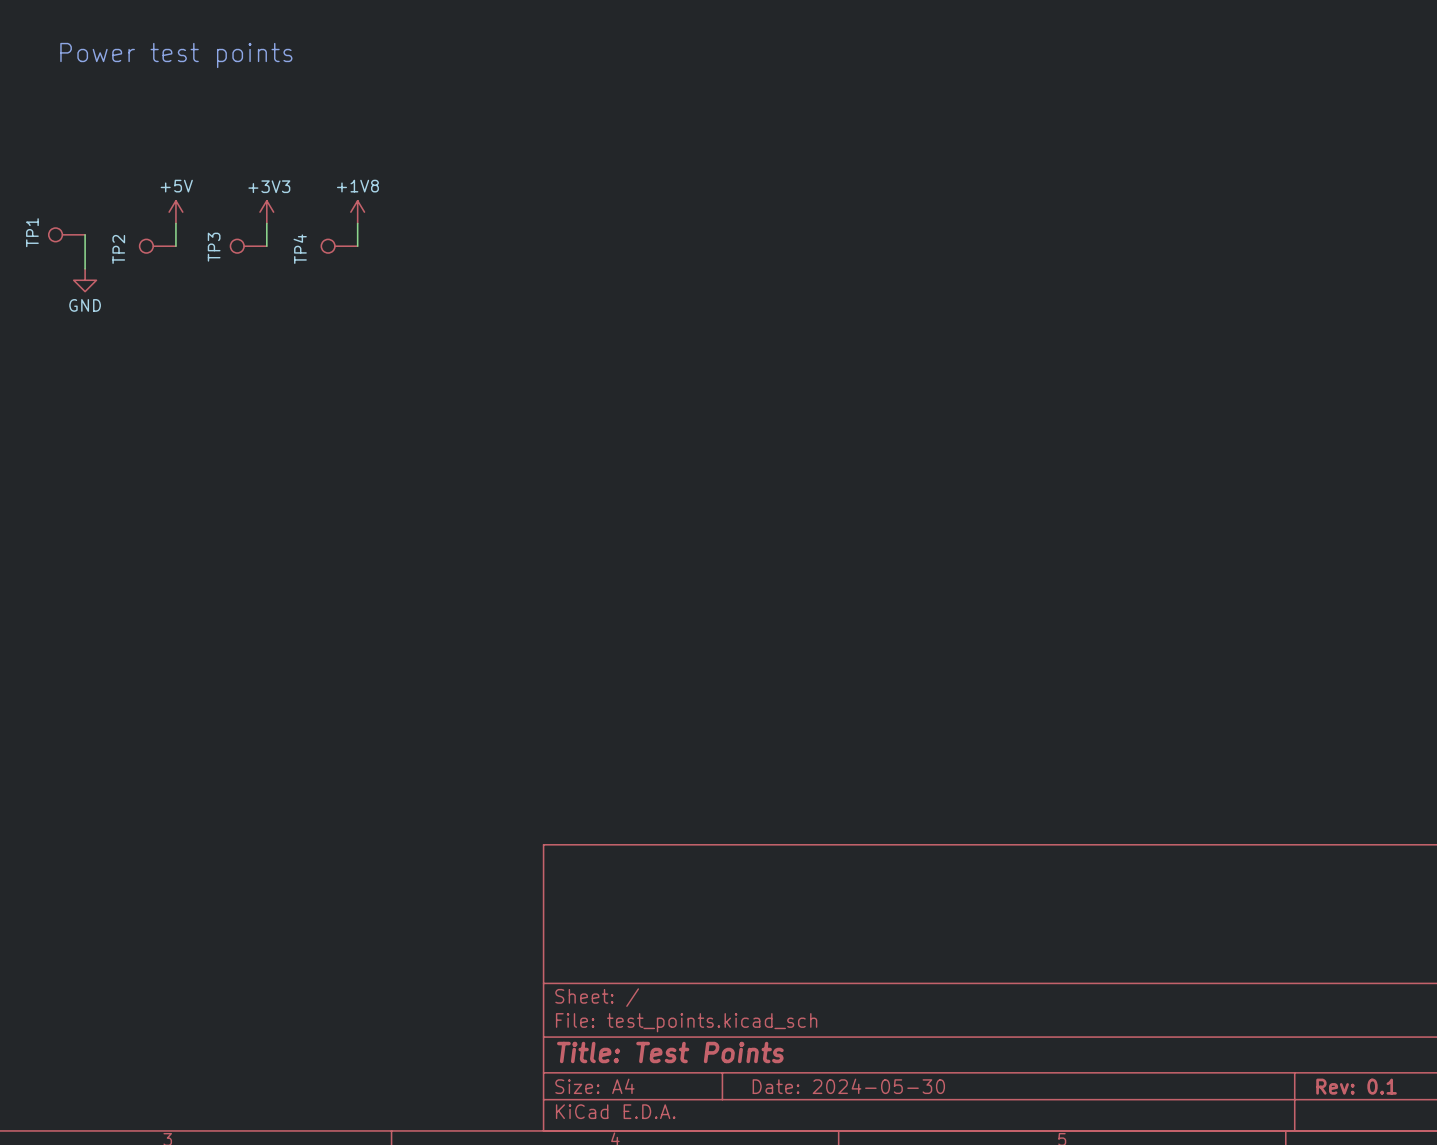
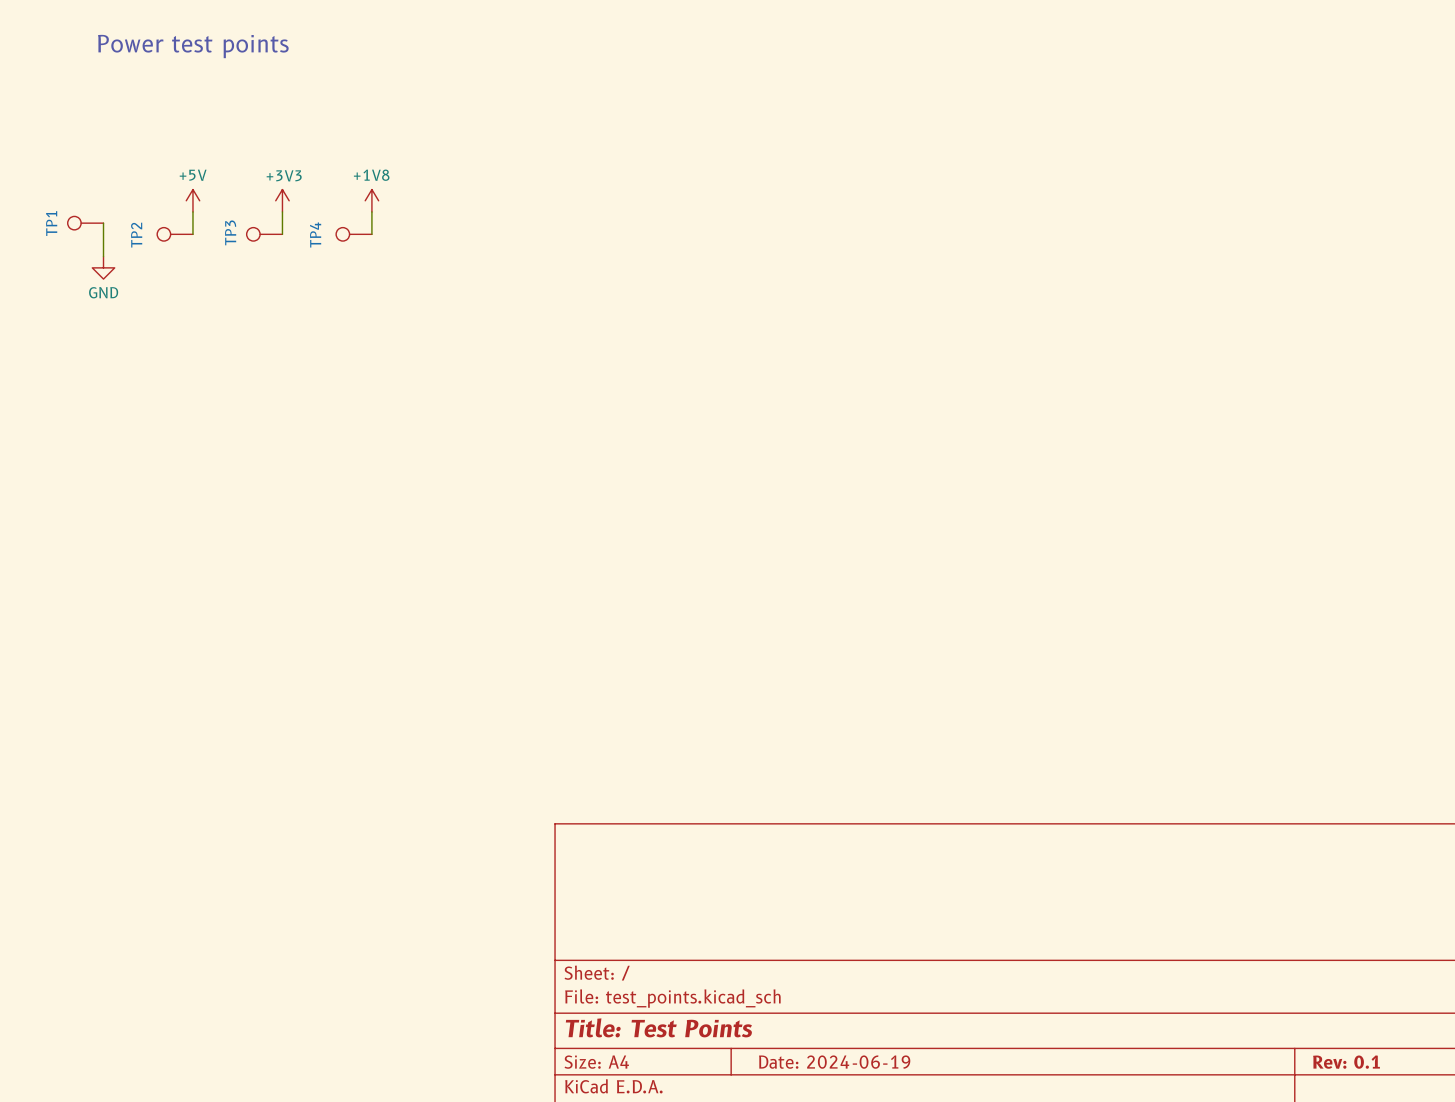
title block: Date: 2024-05-30 (848, 1086) -> Date: 2024-06-19 (834, 1062)

